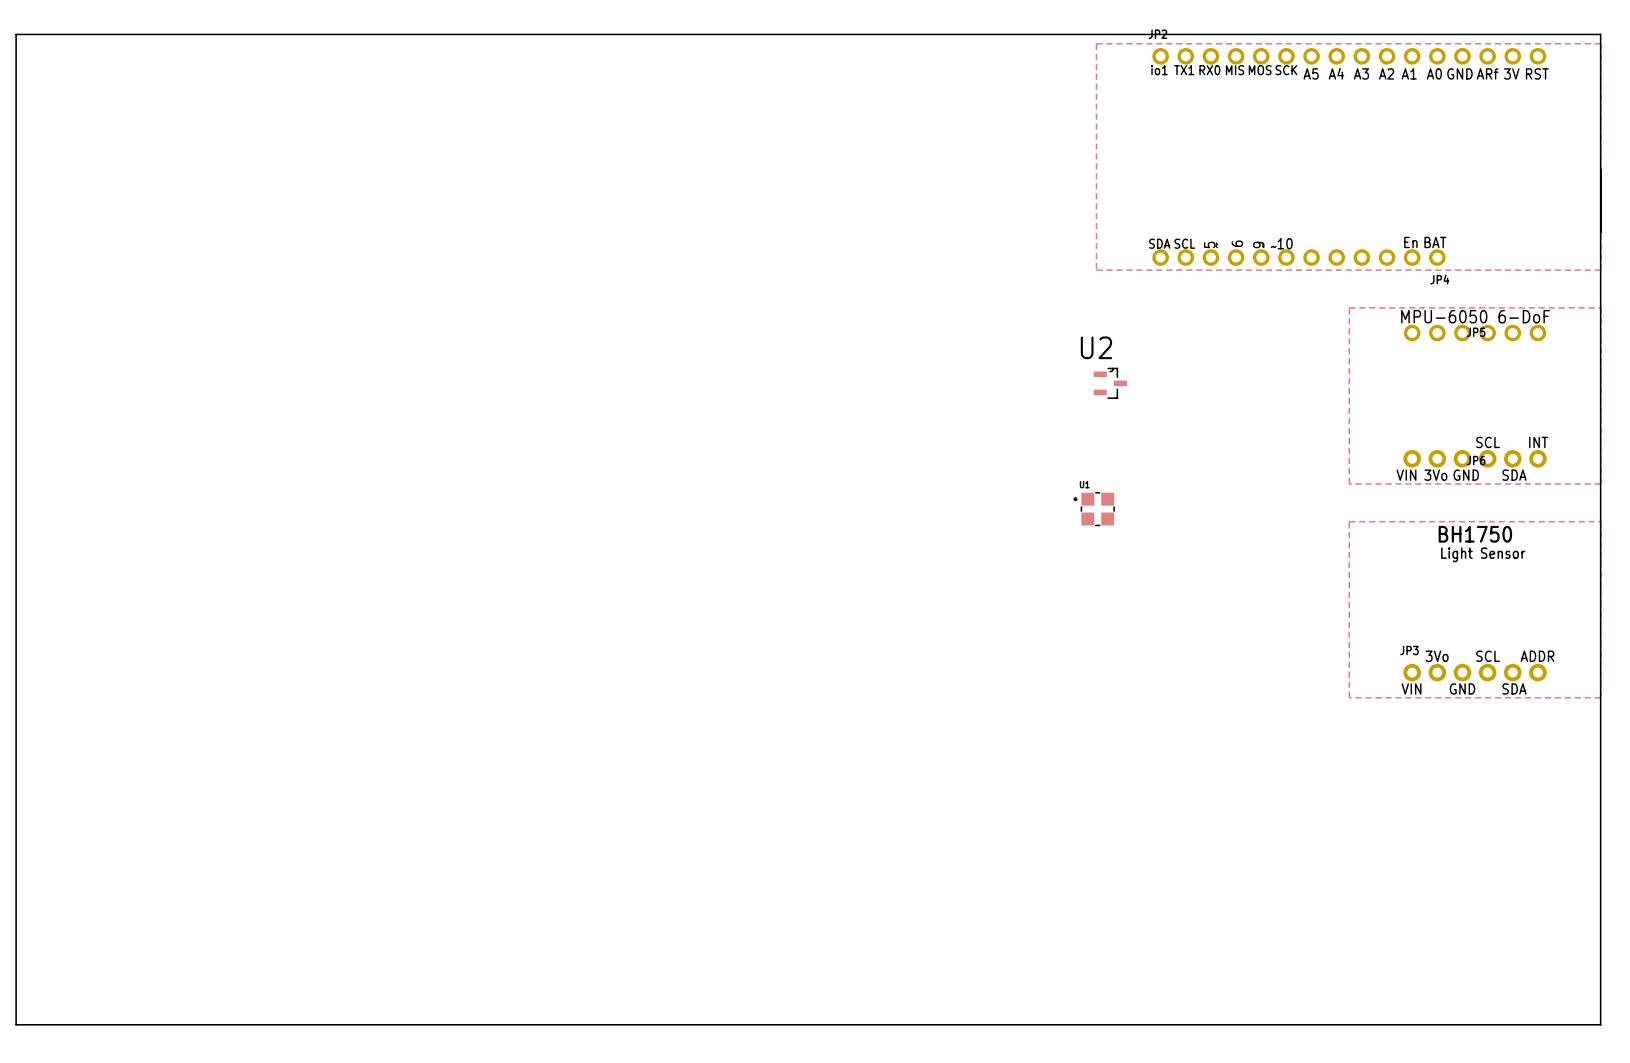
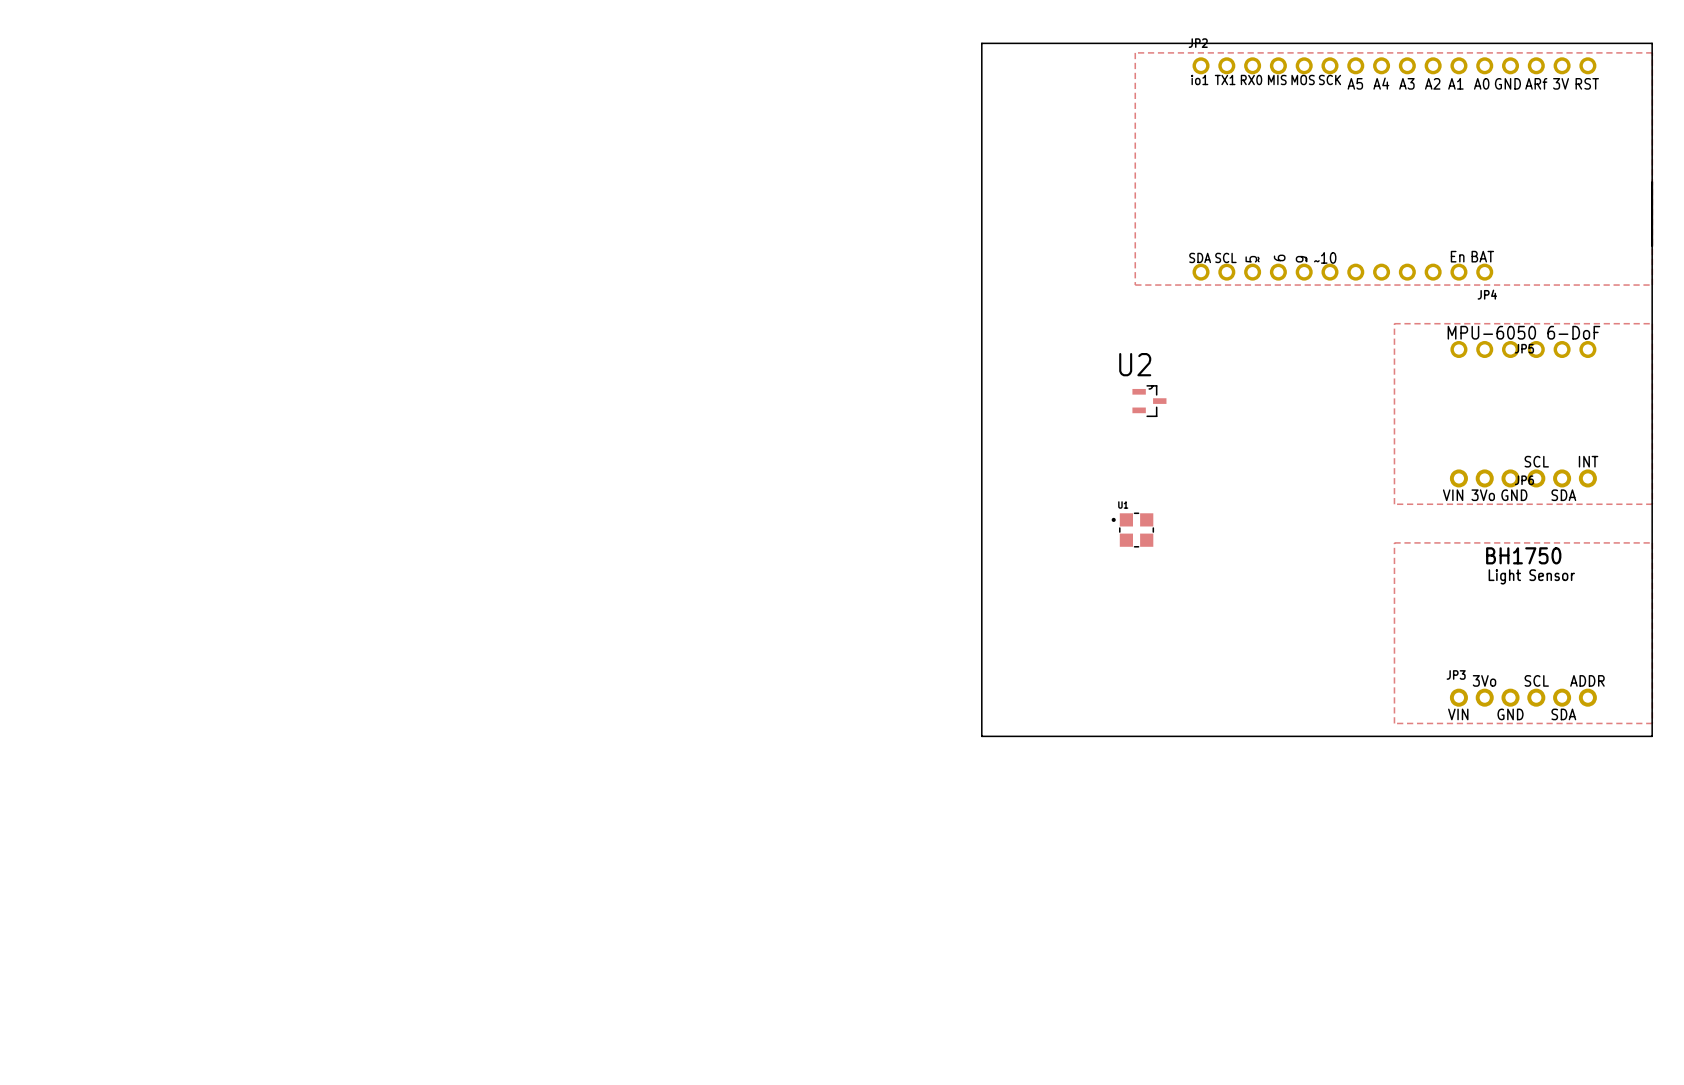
board edge: (946, 34) (16, 34) (16, 1024) (1600, 1024) (1600, 710) -> (981, 43) (981, 736) (1652, 736)

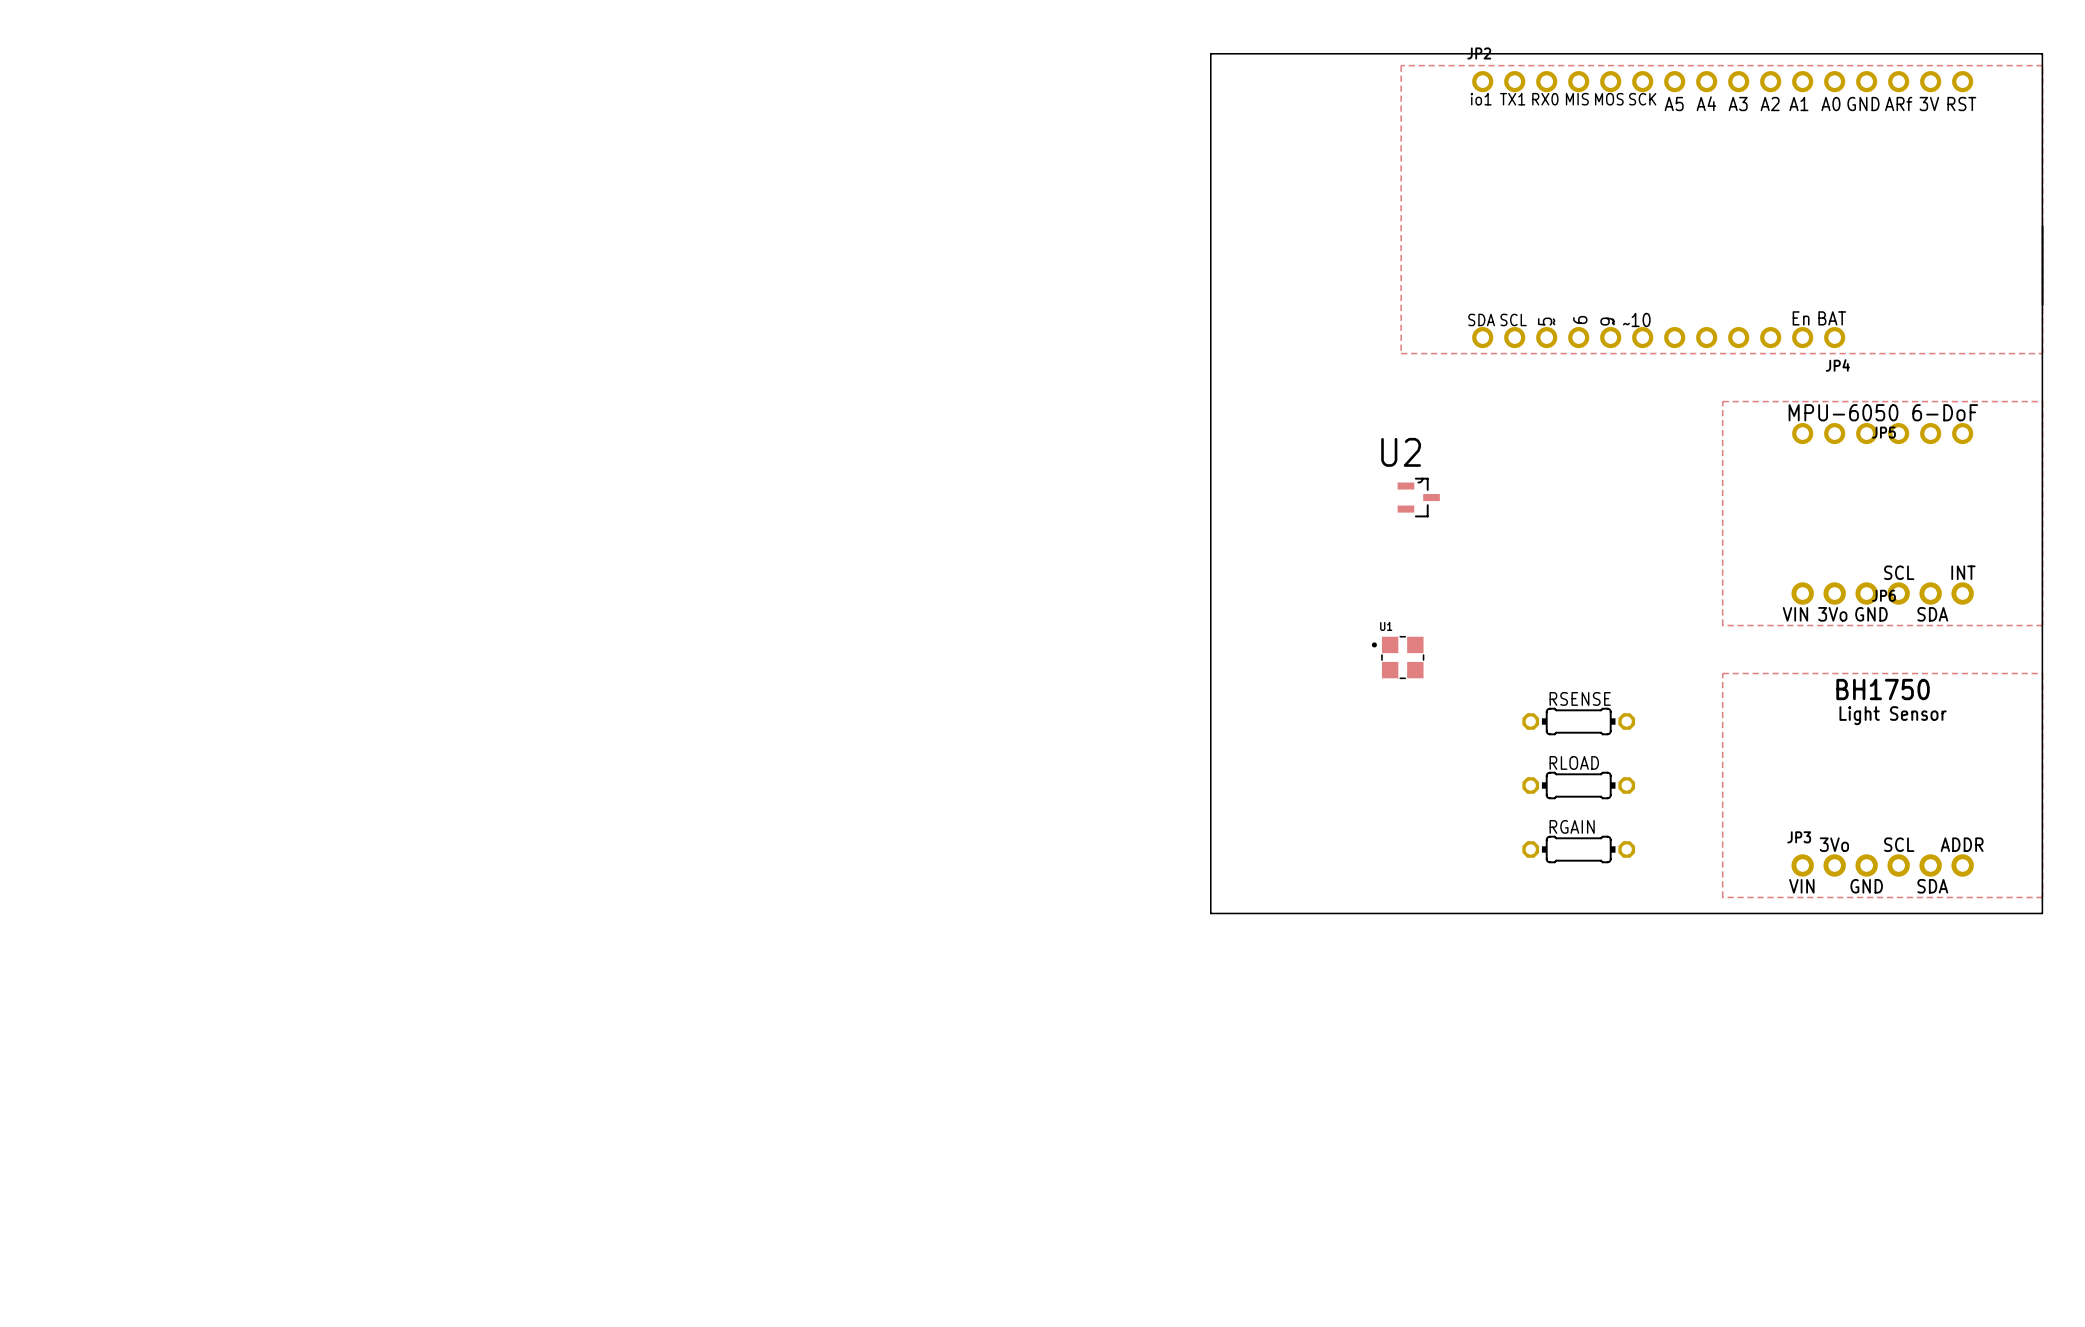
RSENSE: none -> (1578, 721)
RLOAD: none -> (1578, 785)
RGAIN: none -> (1578, 849)

